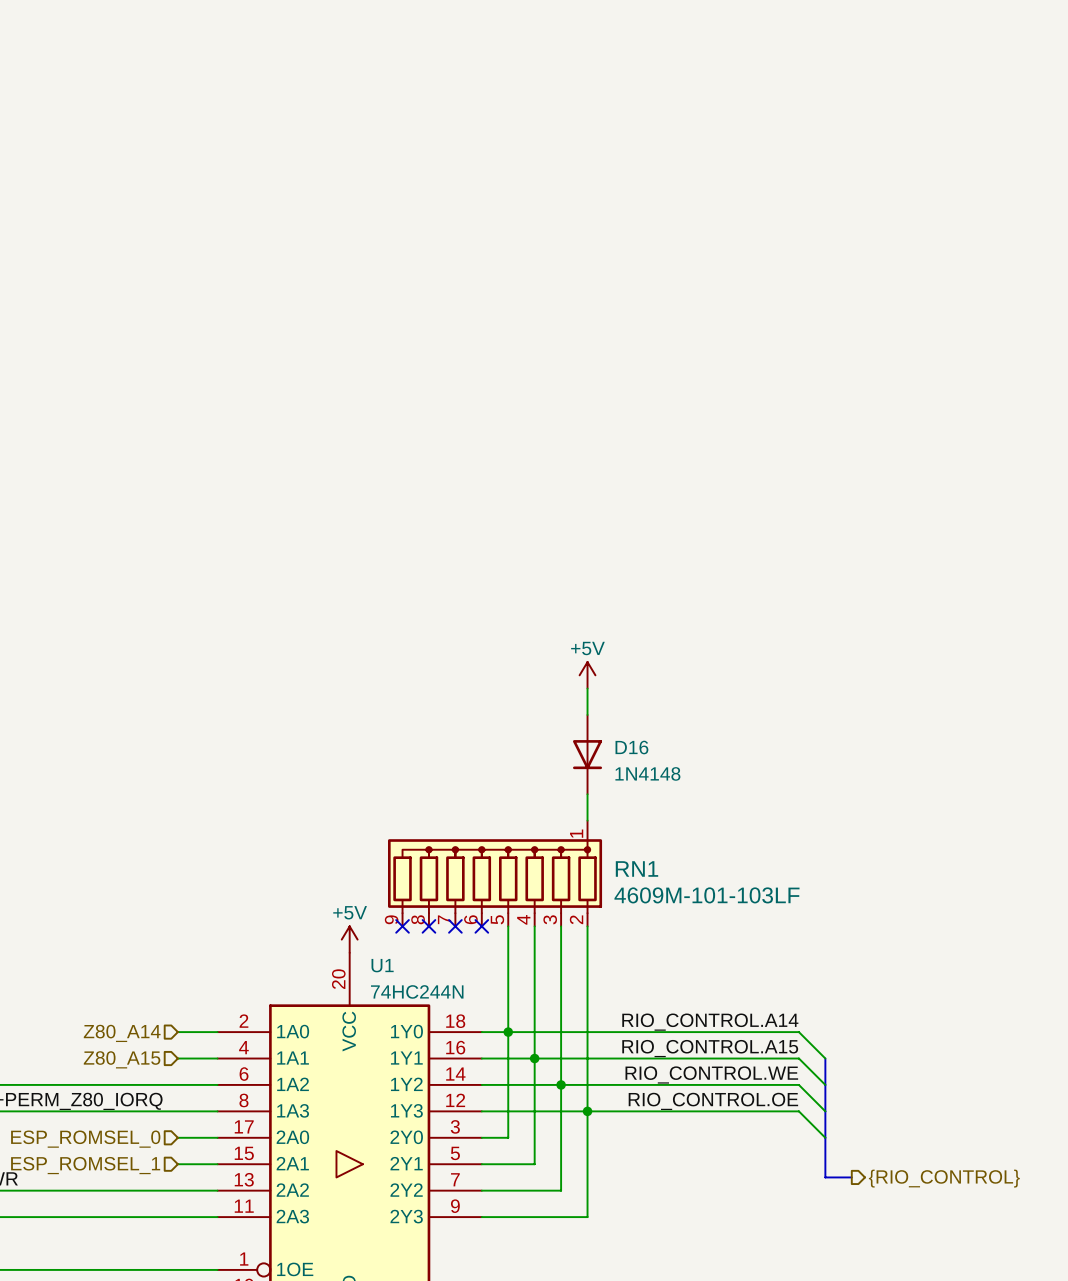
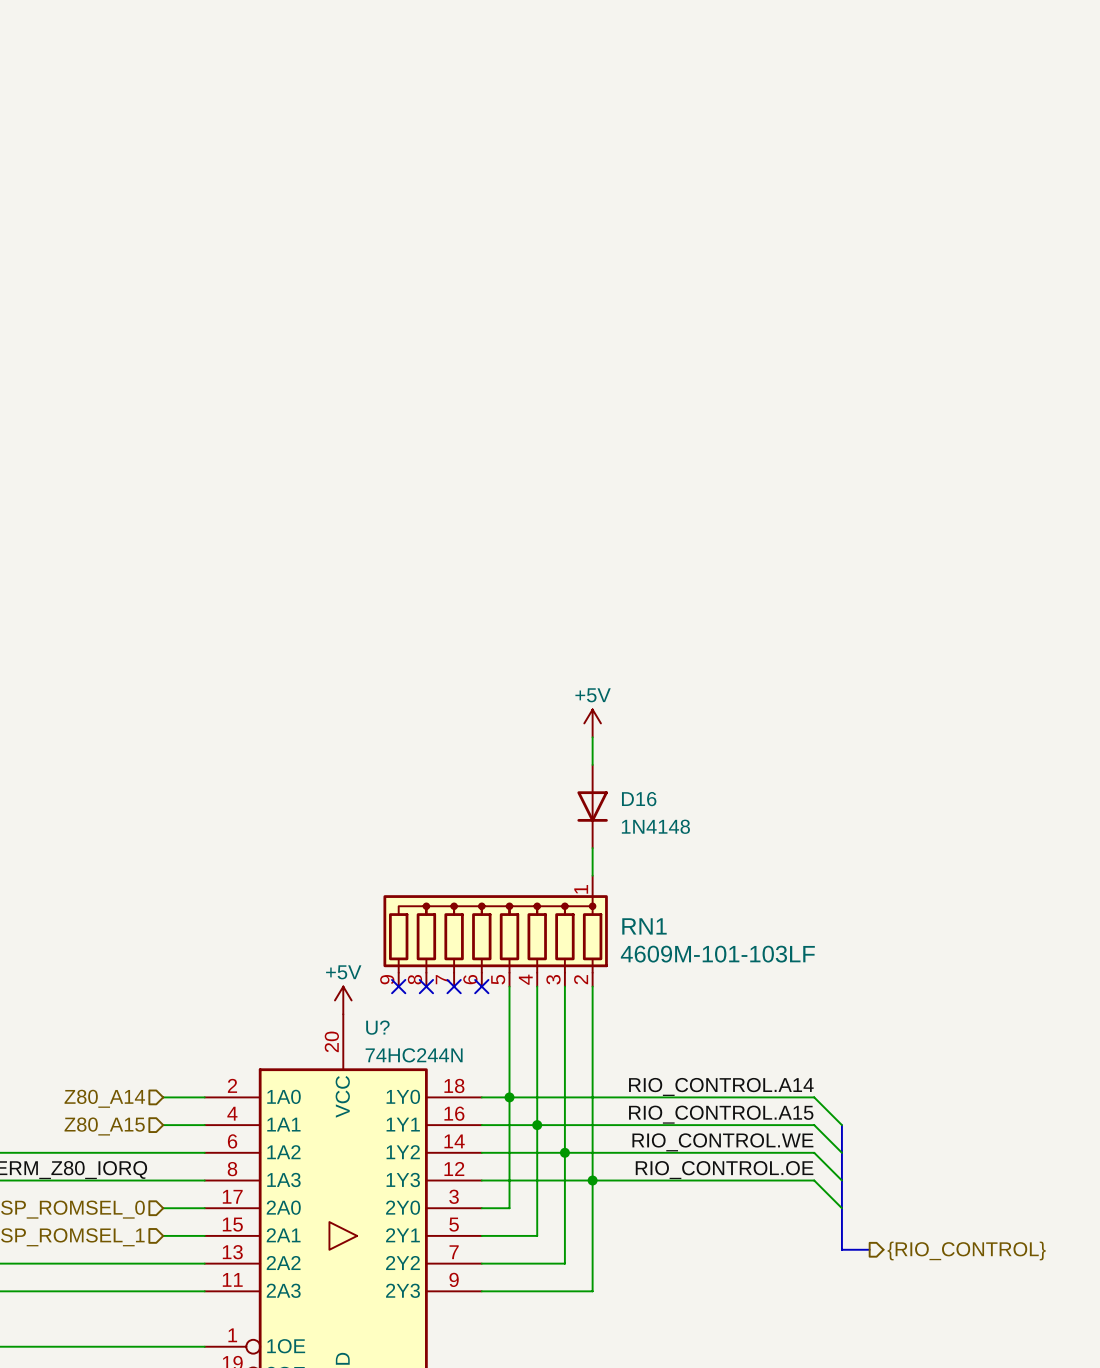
U1 name: U1 (382, 965) -> U? (377, 1027)

